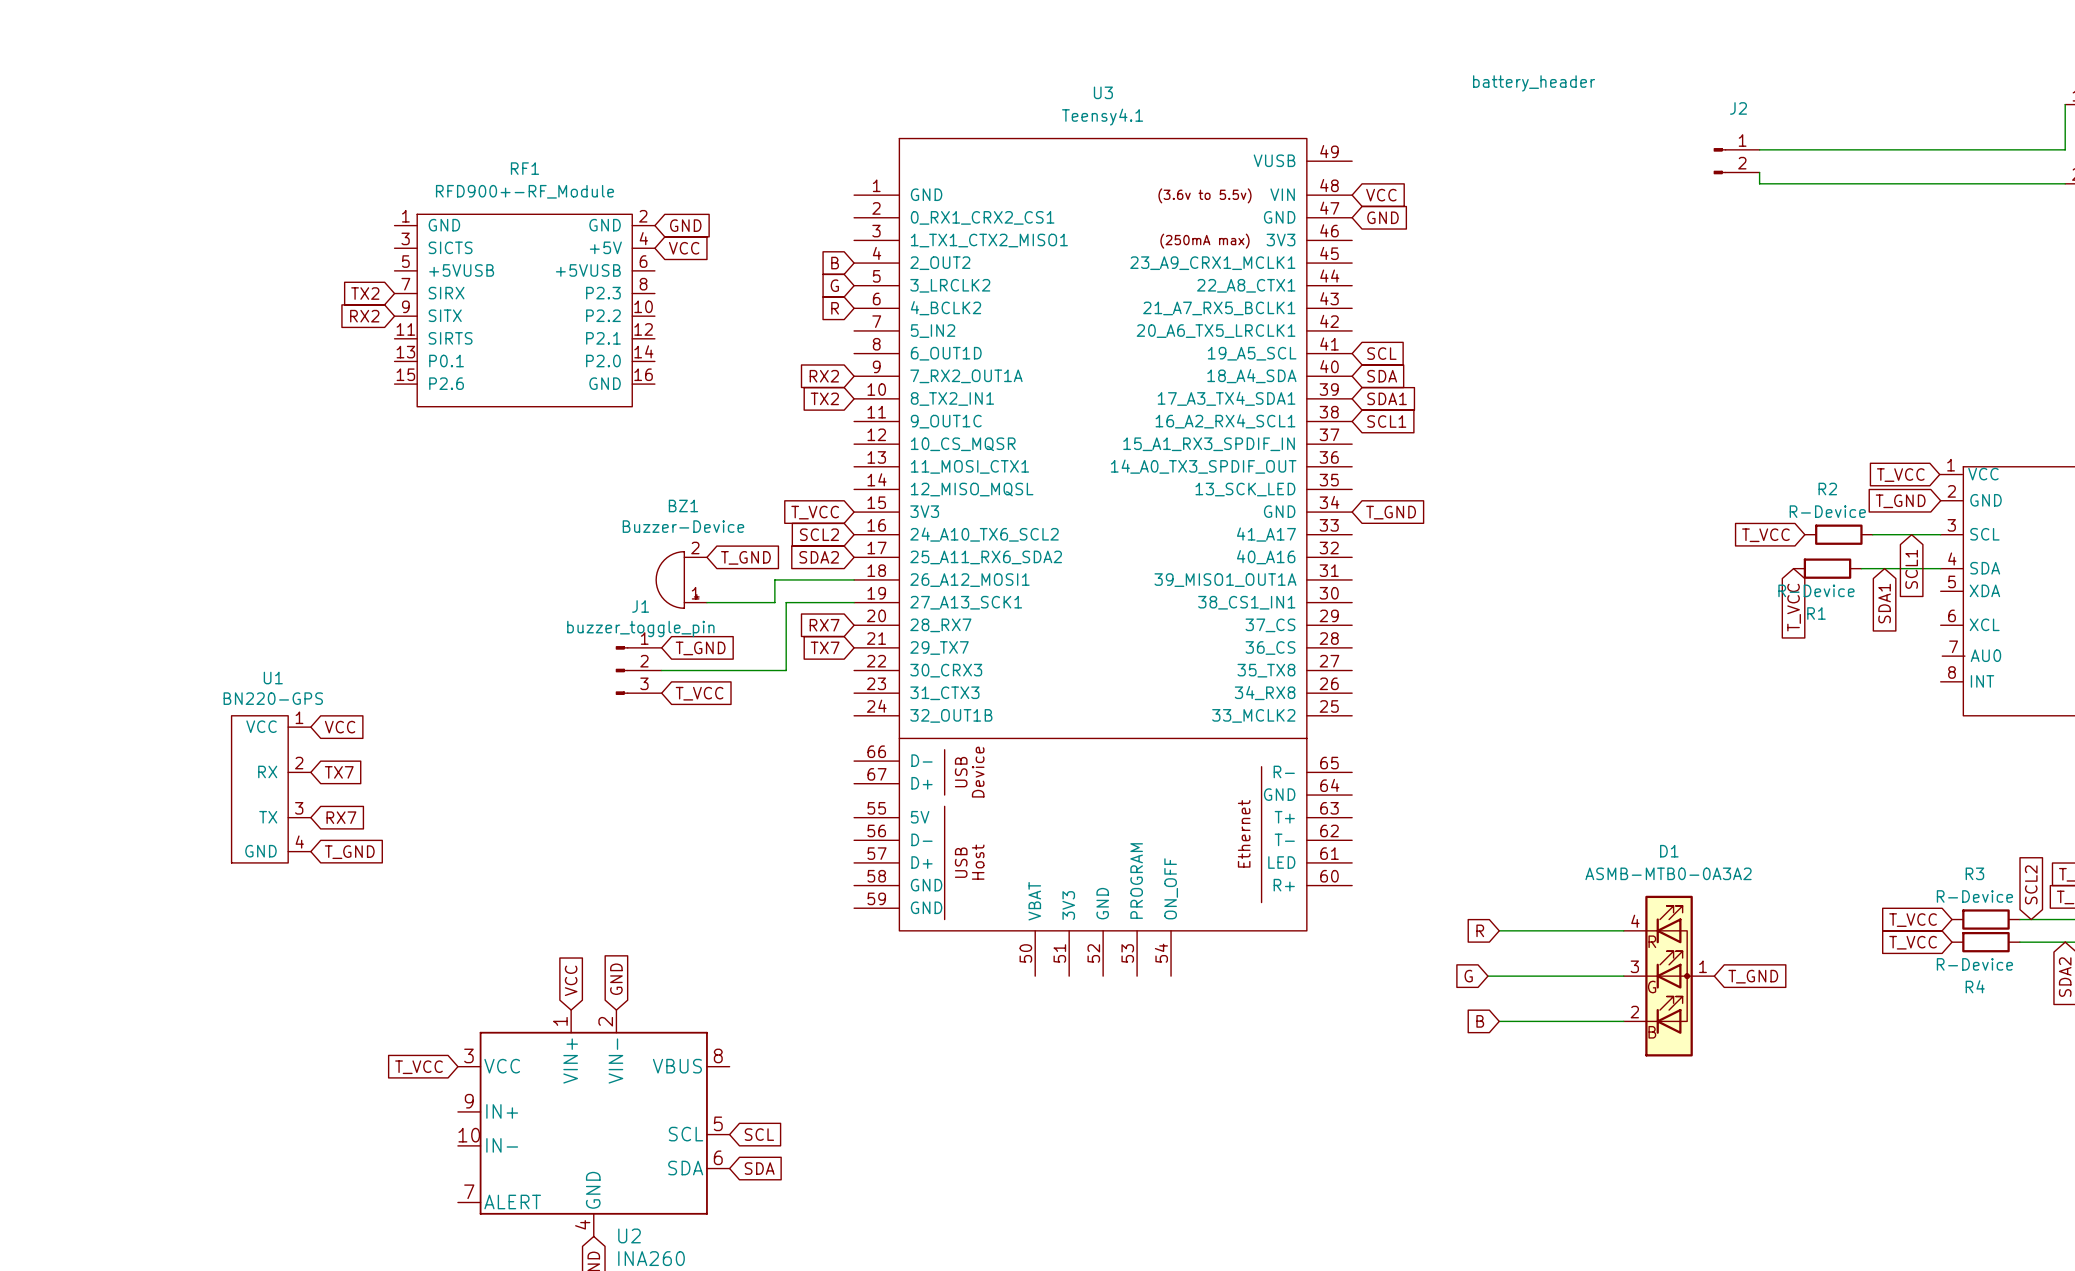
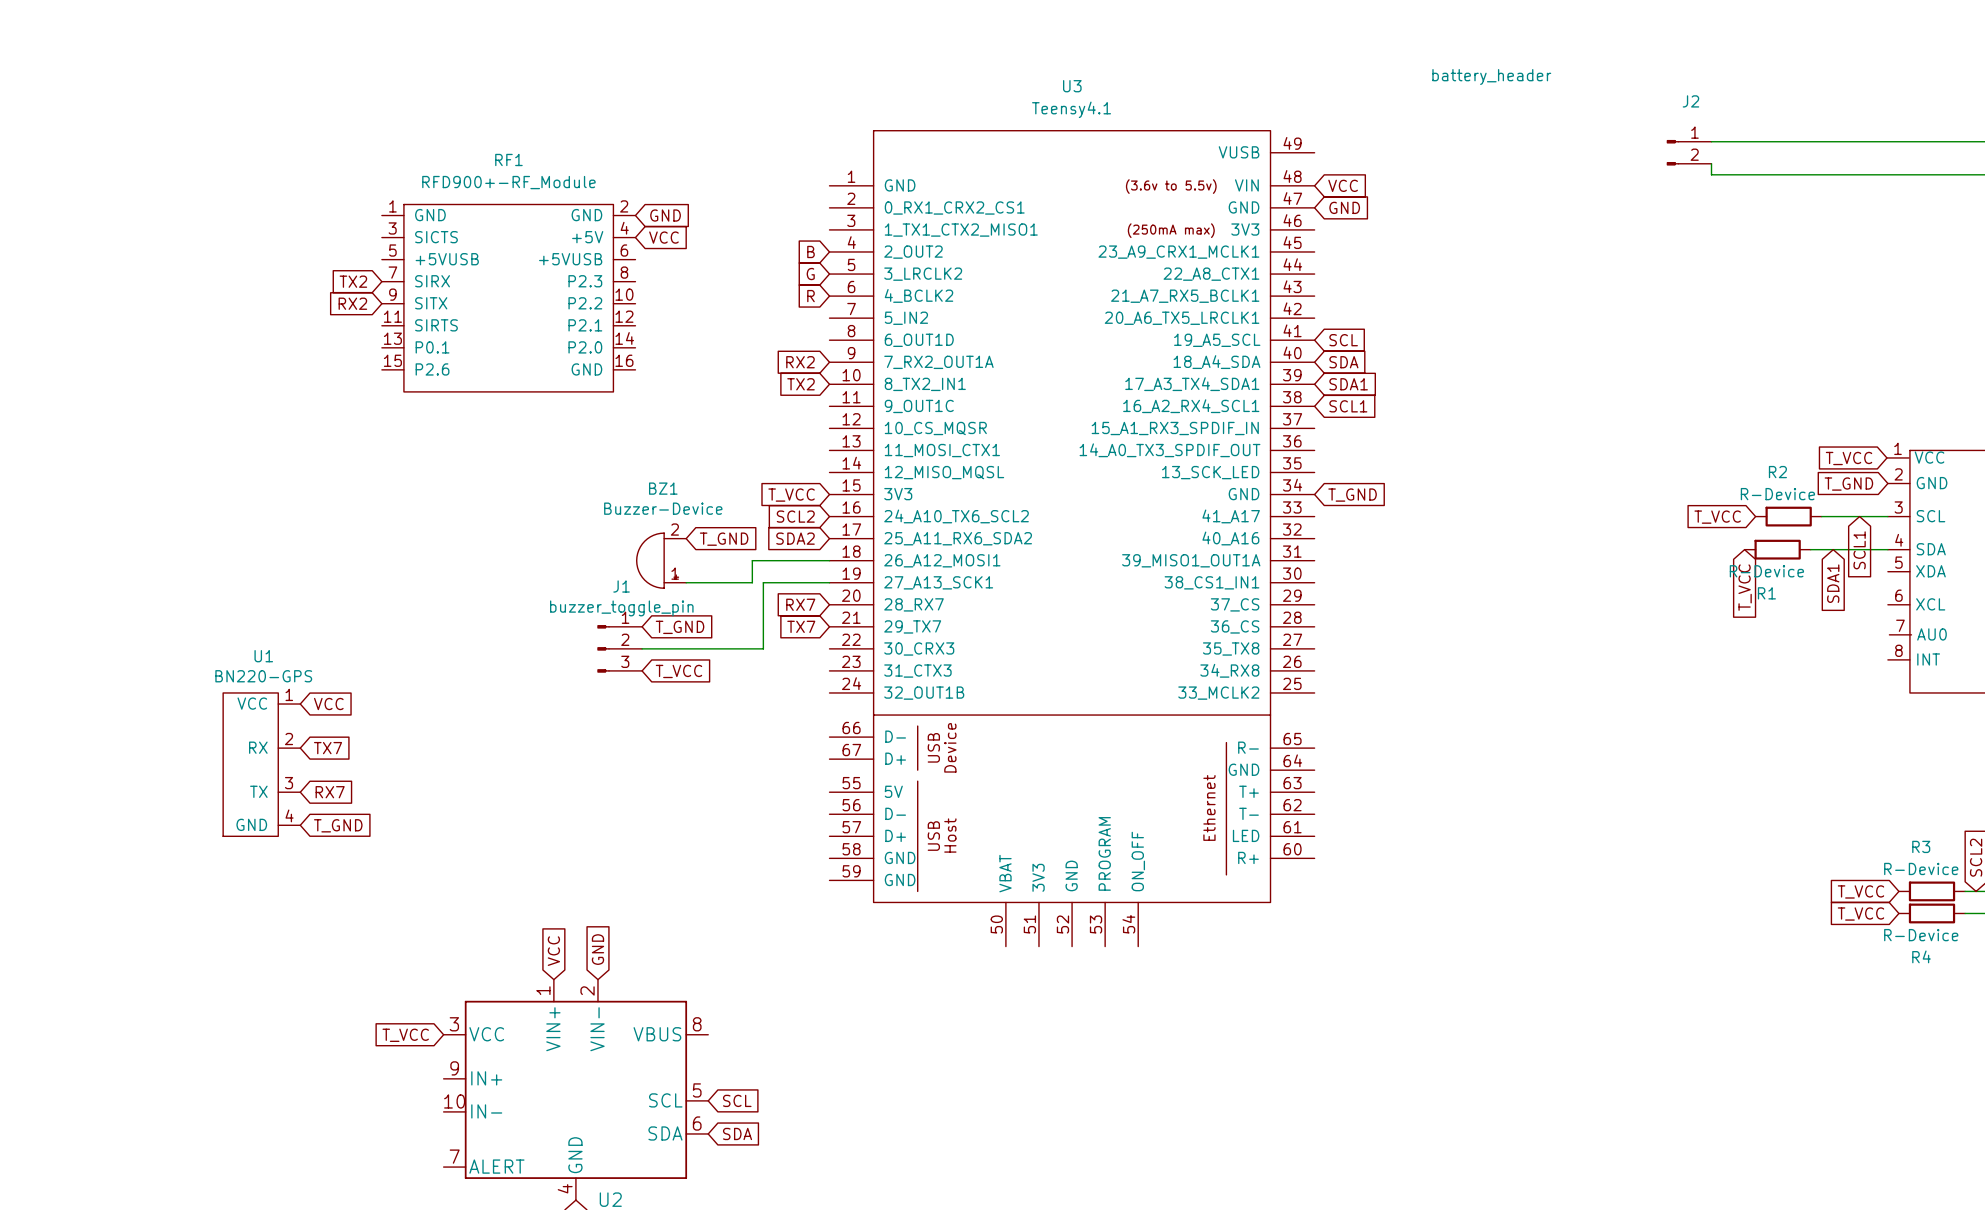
global label: R (1480, 930) -> none
wire: (1499, 930) (1623, 930) -> none
global label: G (1468, 976) -> none
wire: (1487, 976) (1623, 976) -> none
D1: ASMB-MTB0-0A3A2 (1669, 976) -> none
global label: T_GND (1753, 976) -> none
global label: B (1480, 1021) -> none
wire: (1499, 1021) (1623, 1021) -> none

